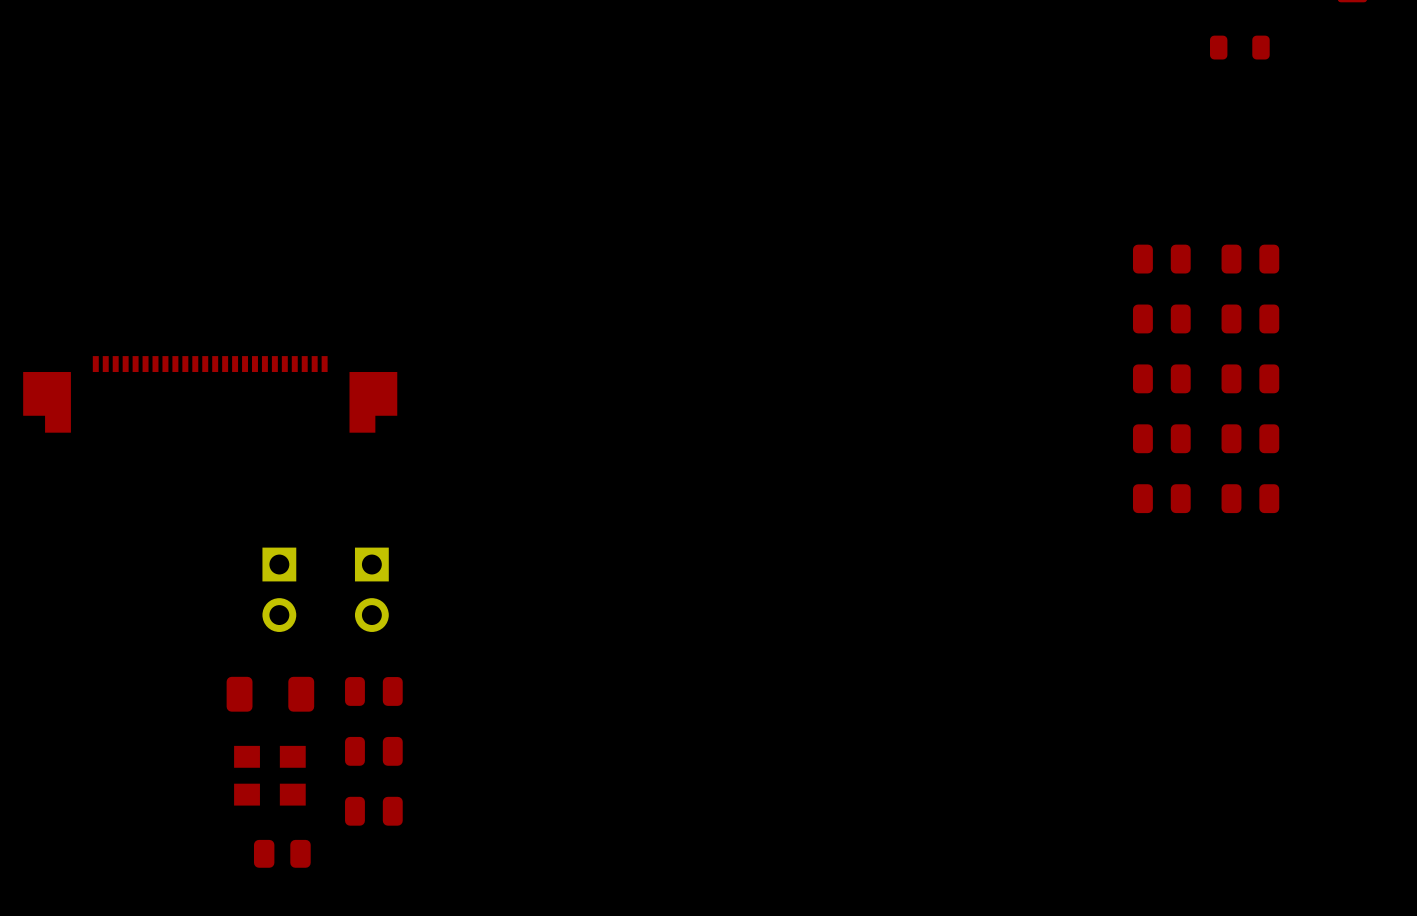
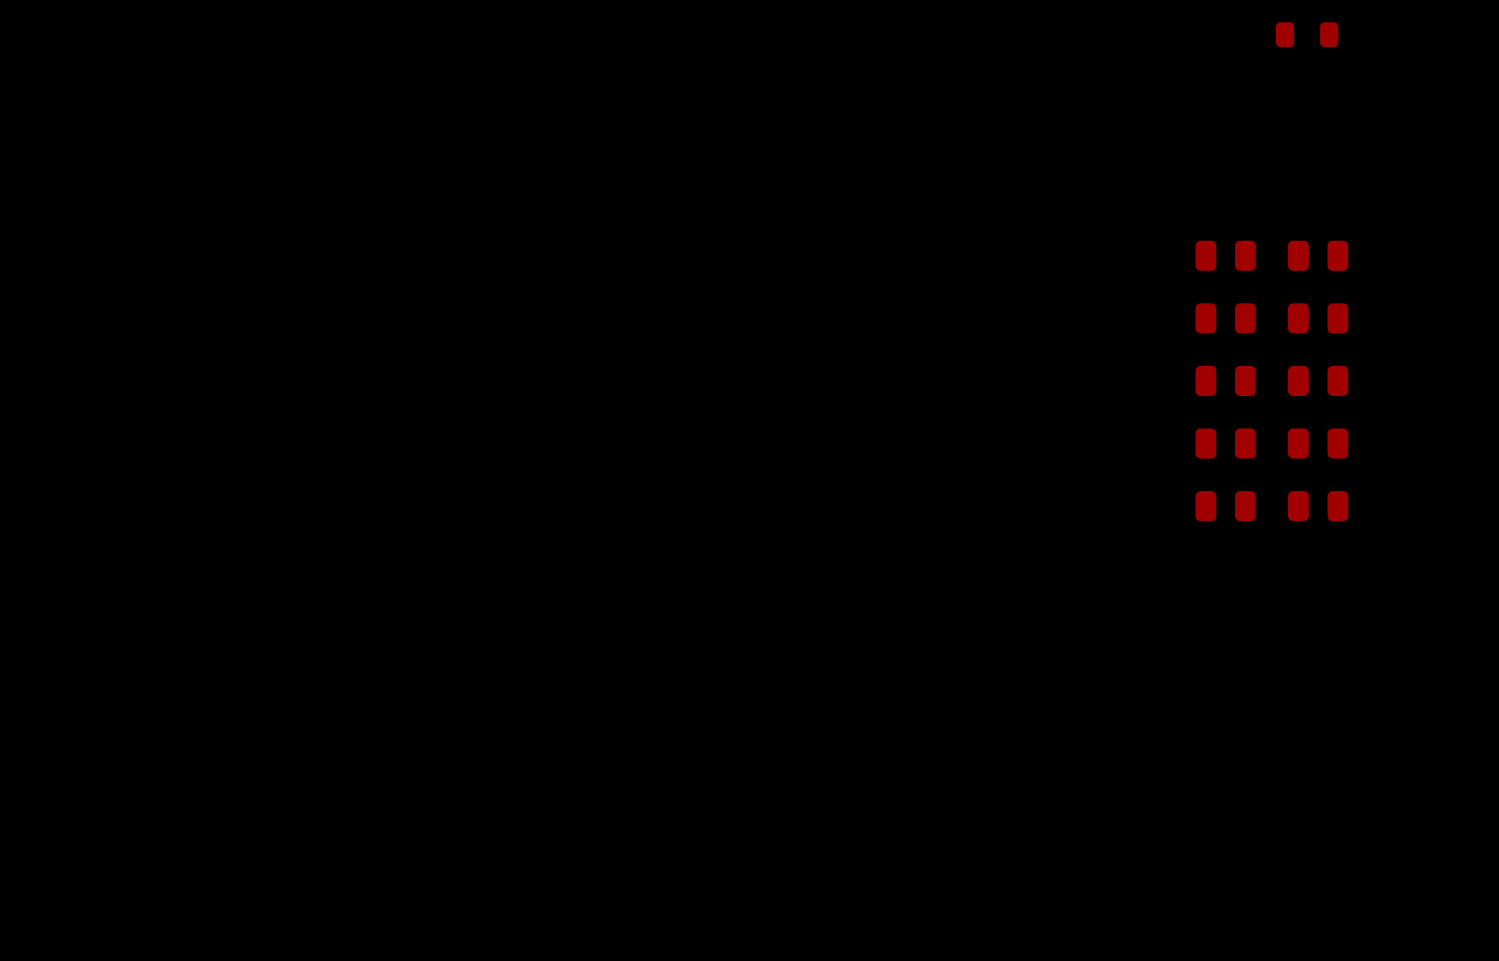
part: (210, 394) -> none
part: (279, 589) -> none
part: (371, 589) -> none
part: (373, 691) -> none
part: (270, 694) -> none
part: (373, 751) -> none
part: (269, 775) -> none
part: (373, 811) -> none
part: (282, 853) -> none

